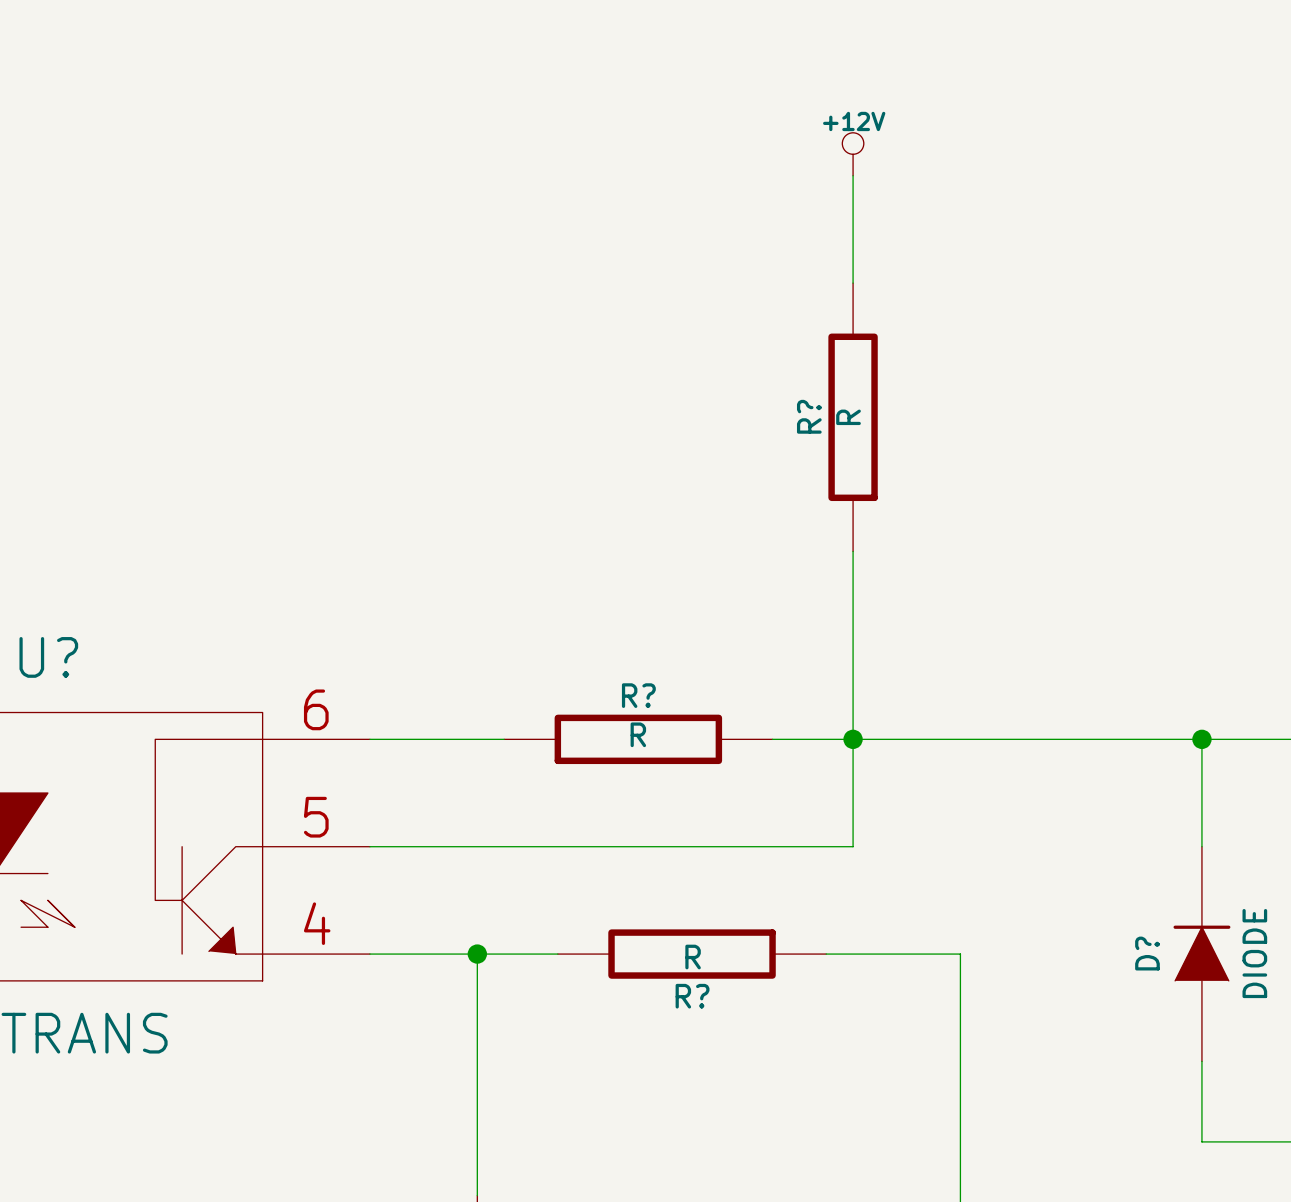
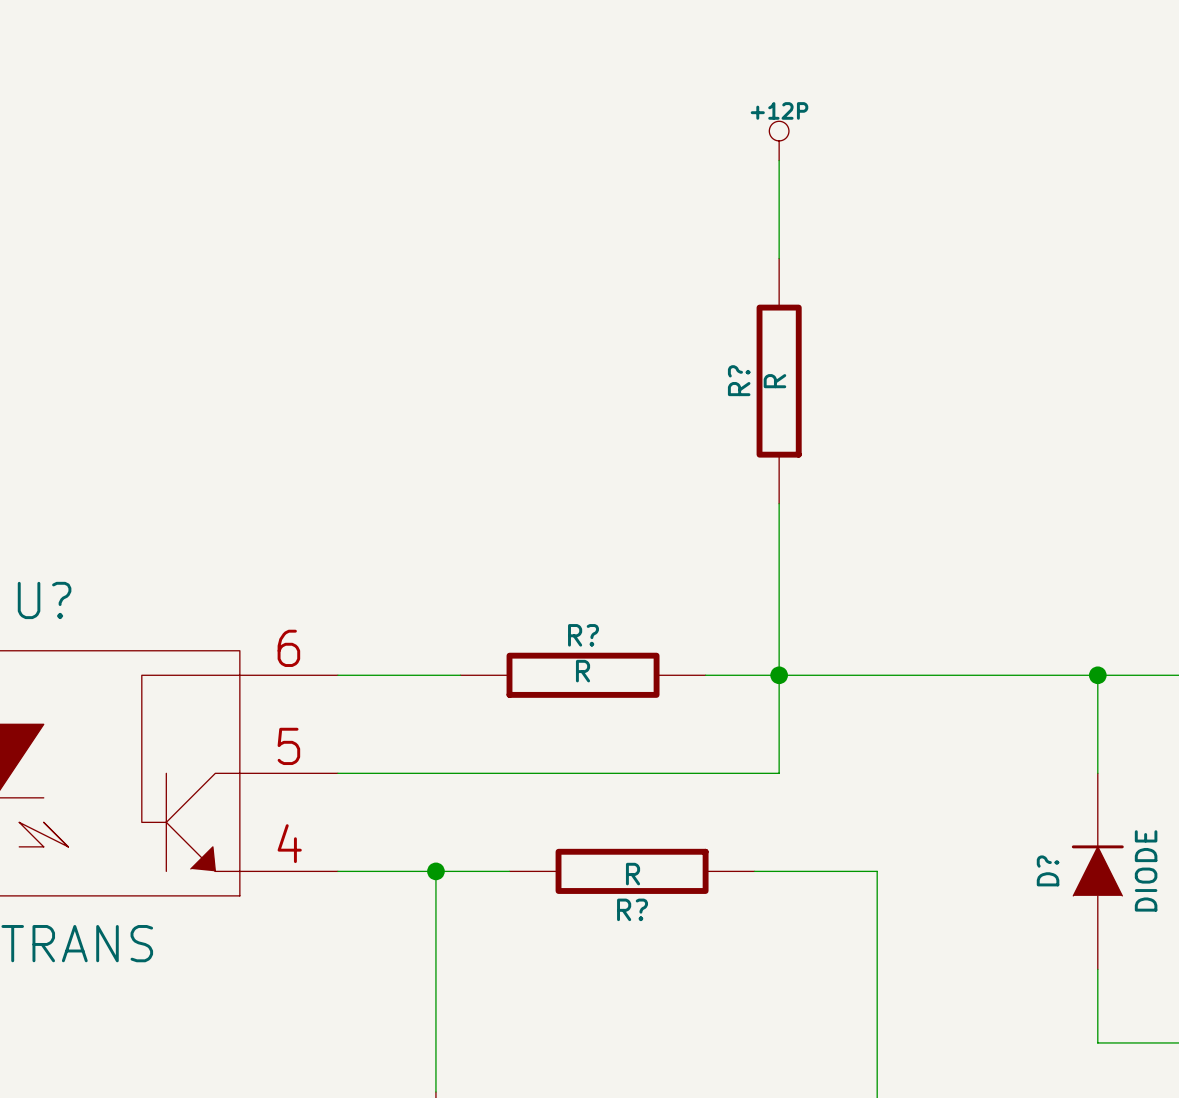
power symbol: +12V (853, 154) -> +12P (779, 140)

